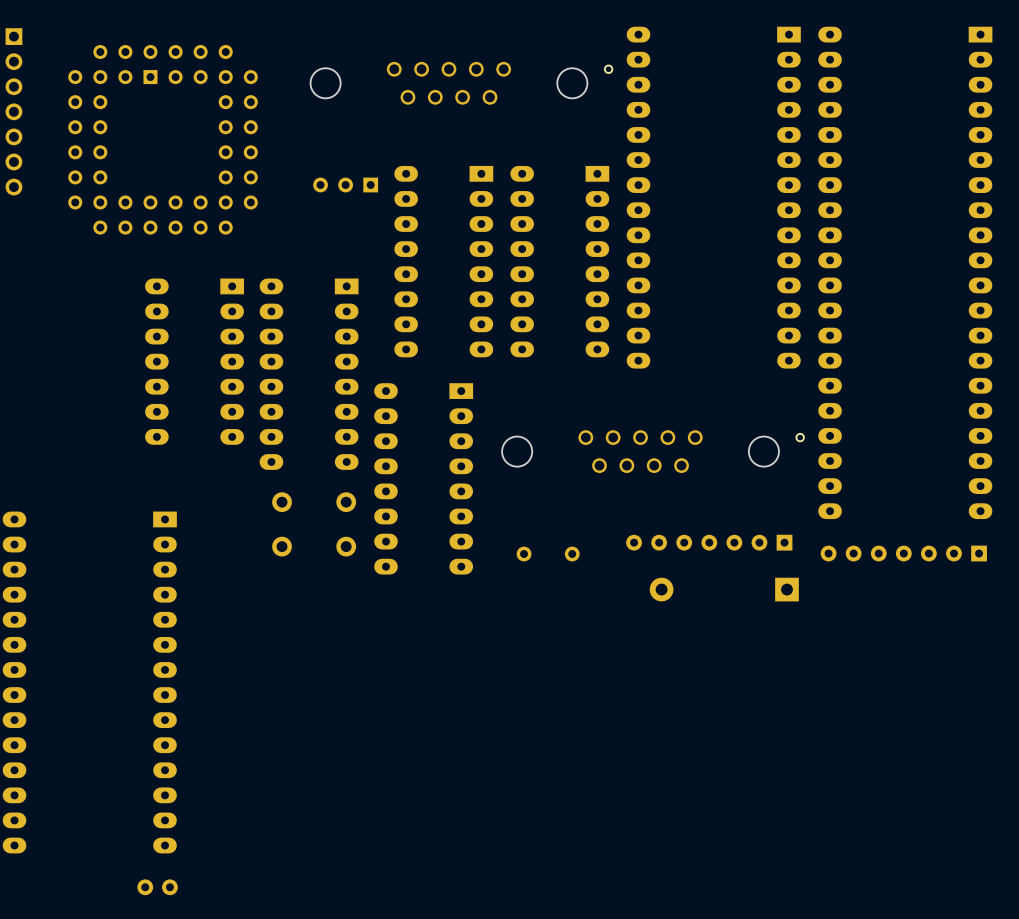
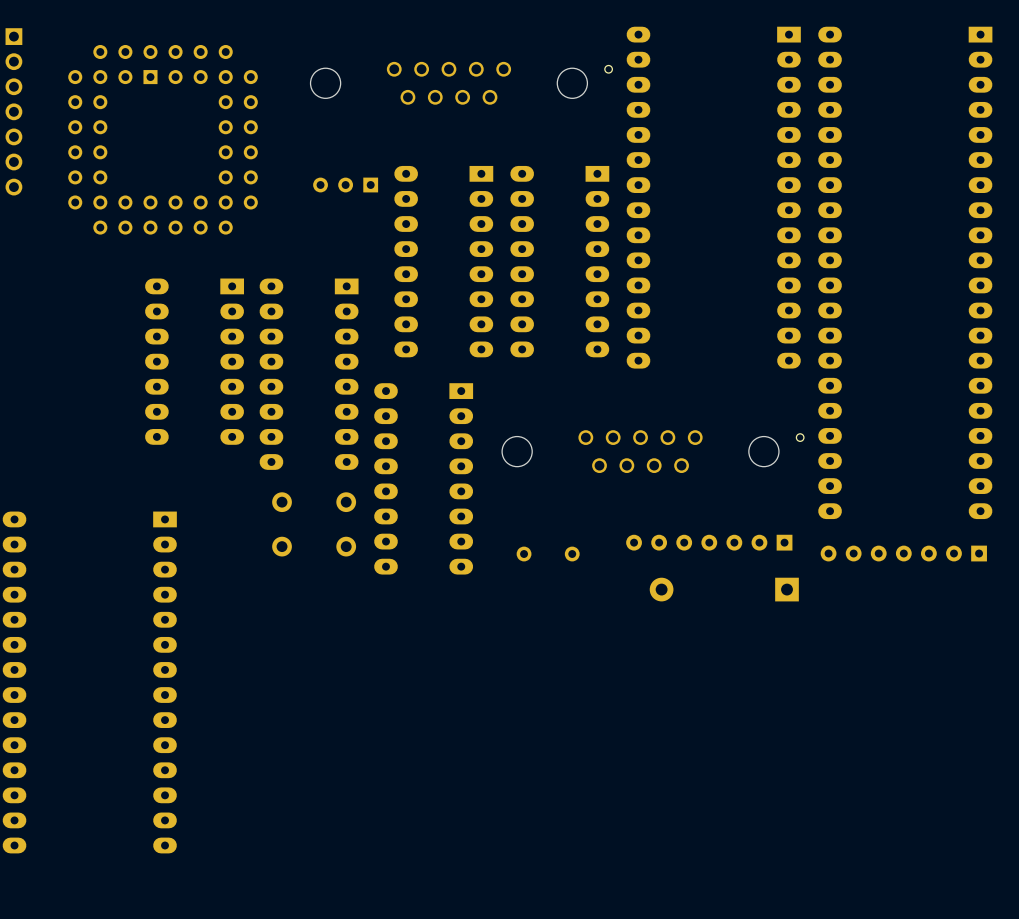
part: (157, 887) -> none

